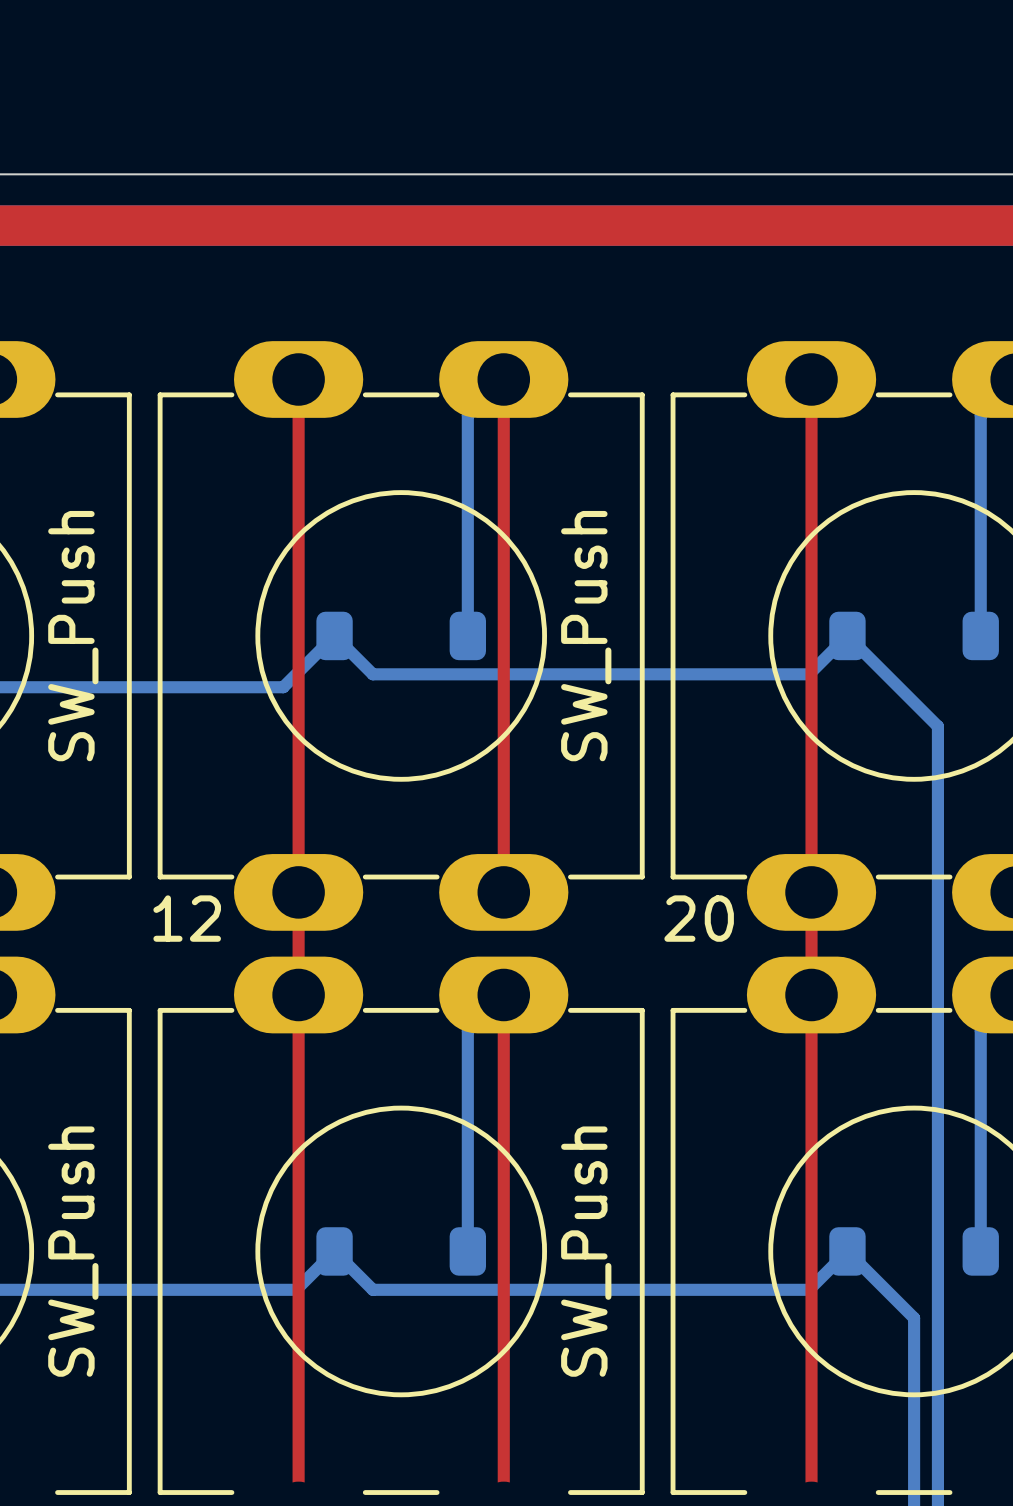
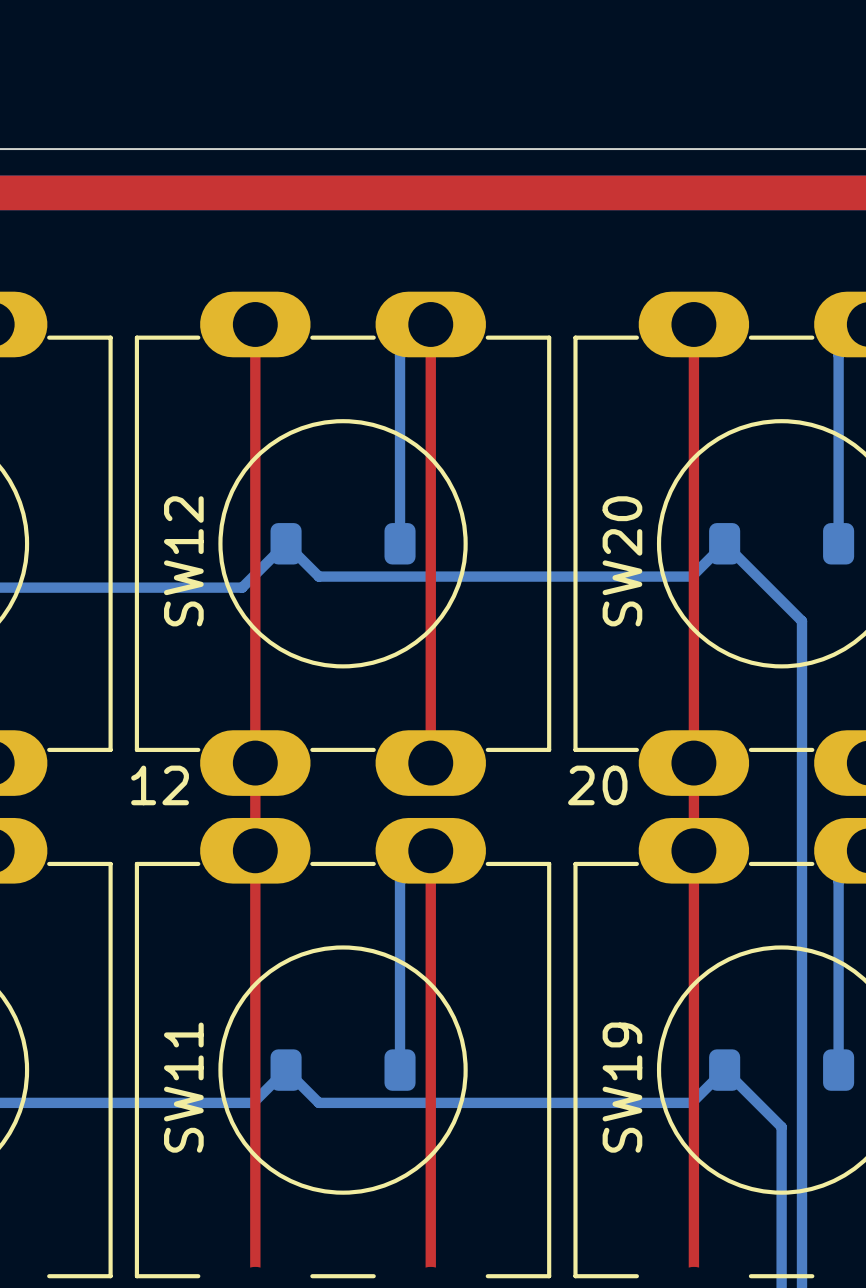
part value: SW_Push (73, 636) -> none
SW12 value: SW_Push (586, 636) -> none
SW12 name: none -> SW12 (183, 561)
SW20 name: none -> SW20 (622, 561)
part value: SW_Push (73, 1251) -> none
SW11 value: SW_Push (586, 1251) -> none
SW11 name: none -> SW11 (183, 1087)
SW19 name: none -> SW19 (622, 1087)

